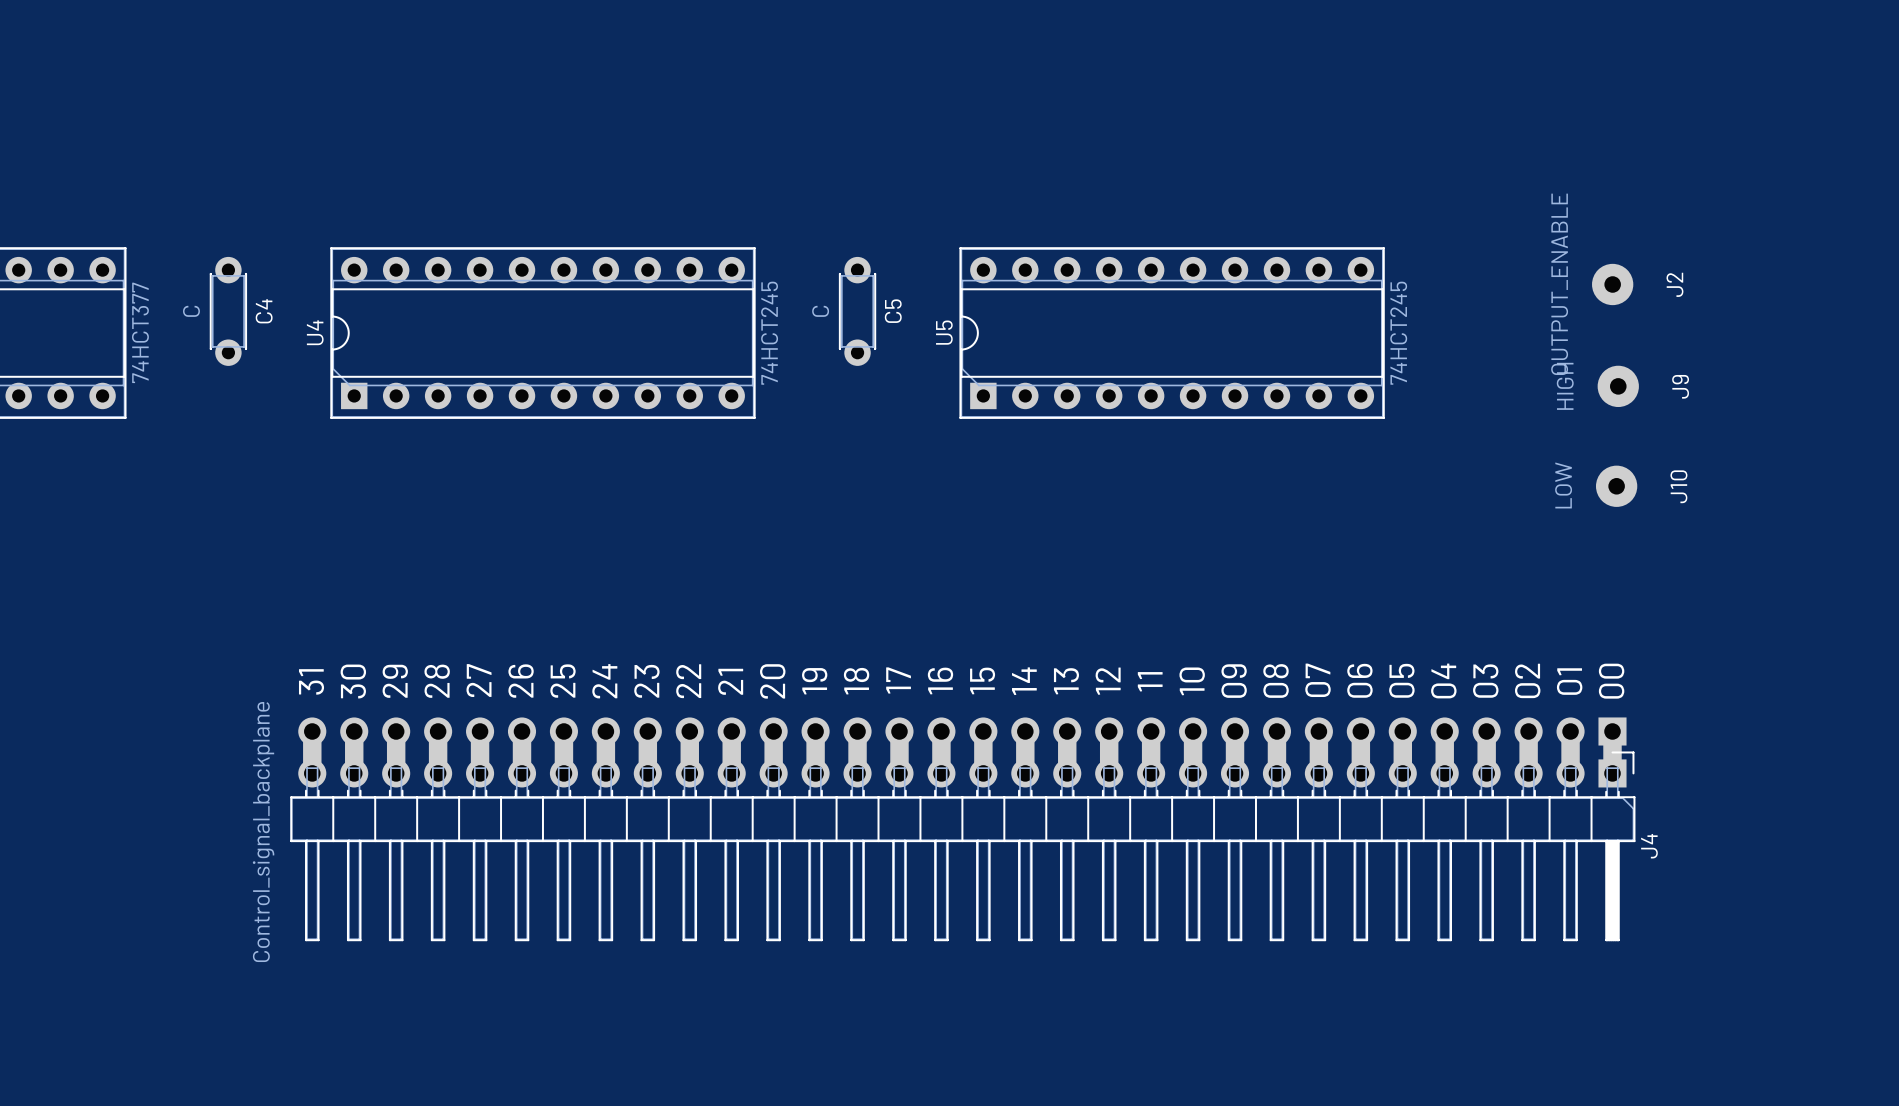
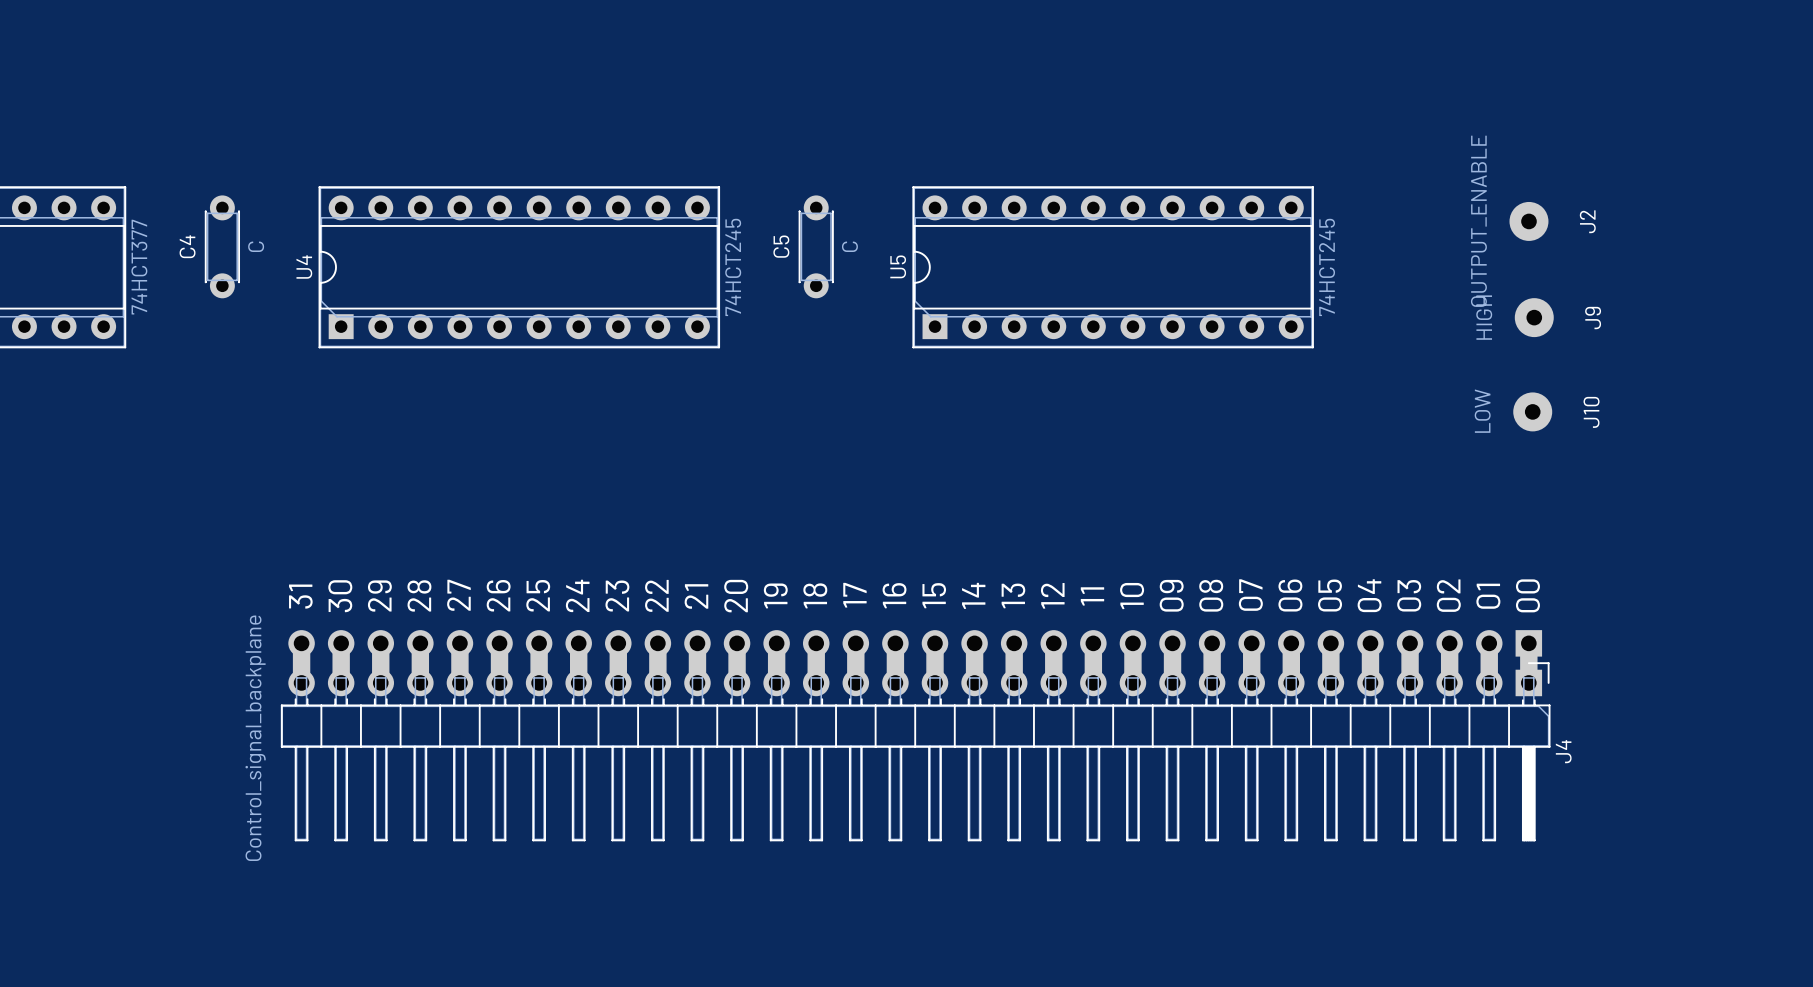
C4 value position: C (191, 311) -> C (256, 246)
C4 name position: C4 (264, 311) -> C4 (187, 246)
C5 value position: C (820, 311) -> C (849, 246)
C5 name position: C5 (893, 311) -> C5 (781, 246)

